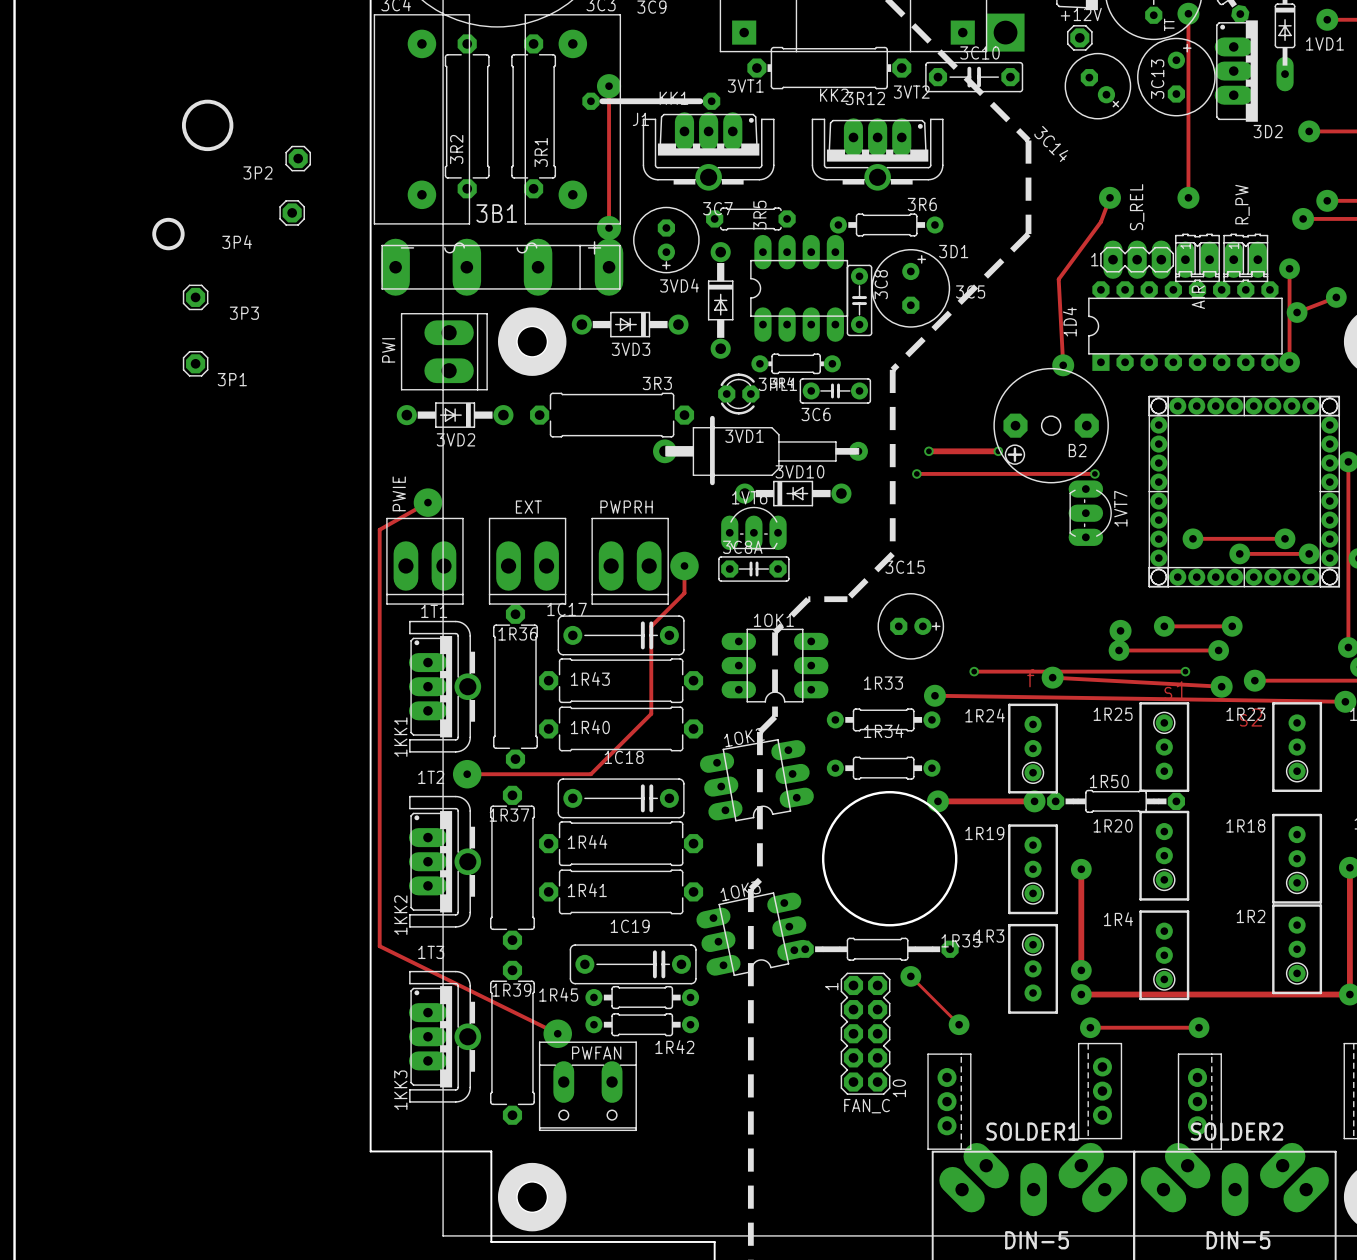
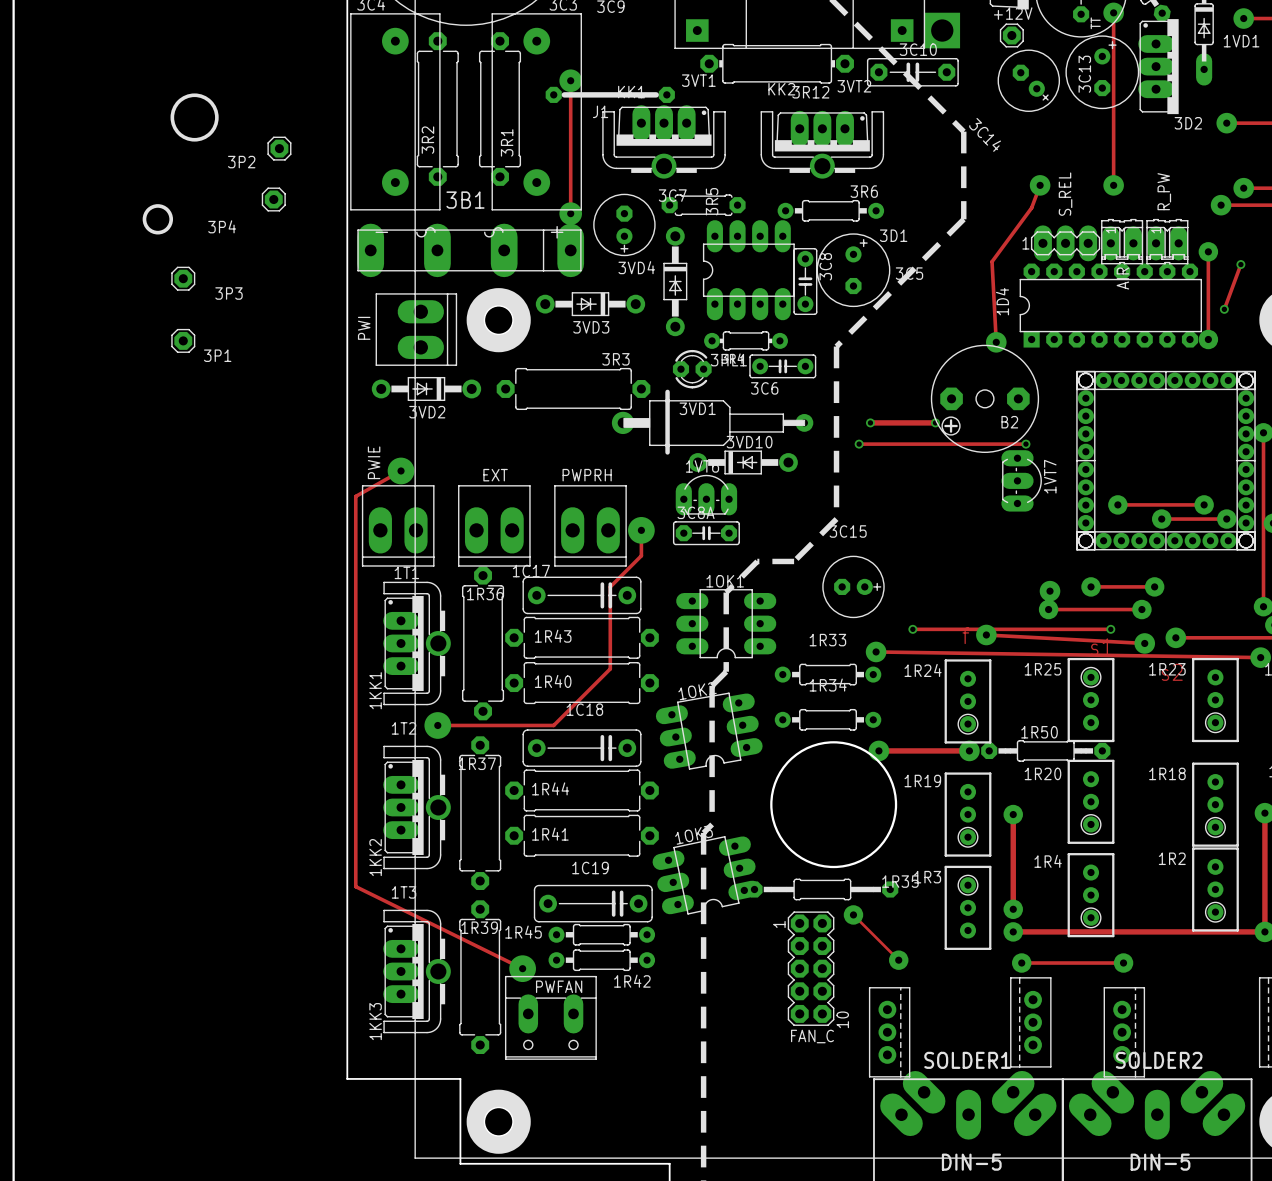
track: none -> (1240, 264) (1224, 309)
via: none -> (1240, 264)
track: (1336, 297) (1297, 312) -> none
via: (1336, 297) -> none
via: (1297, 312) -> none
via: none -> (1224, 309)

